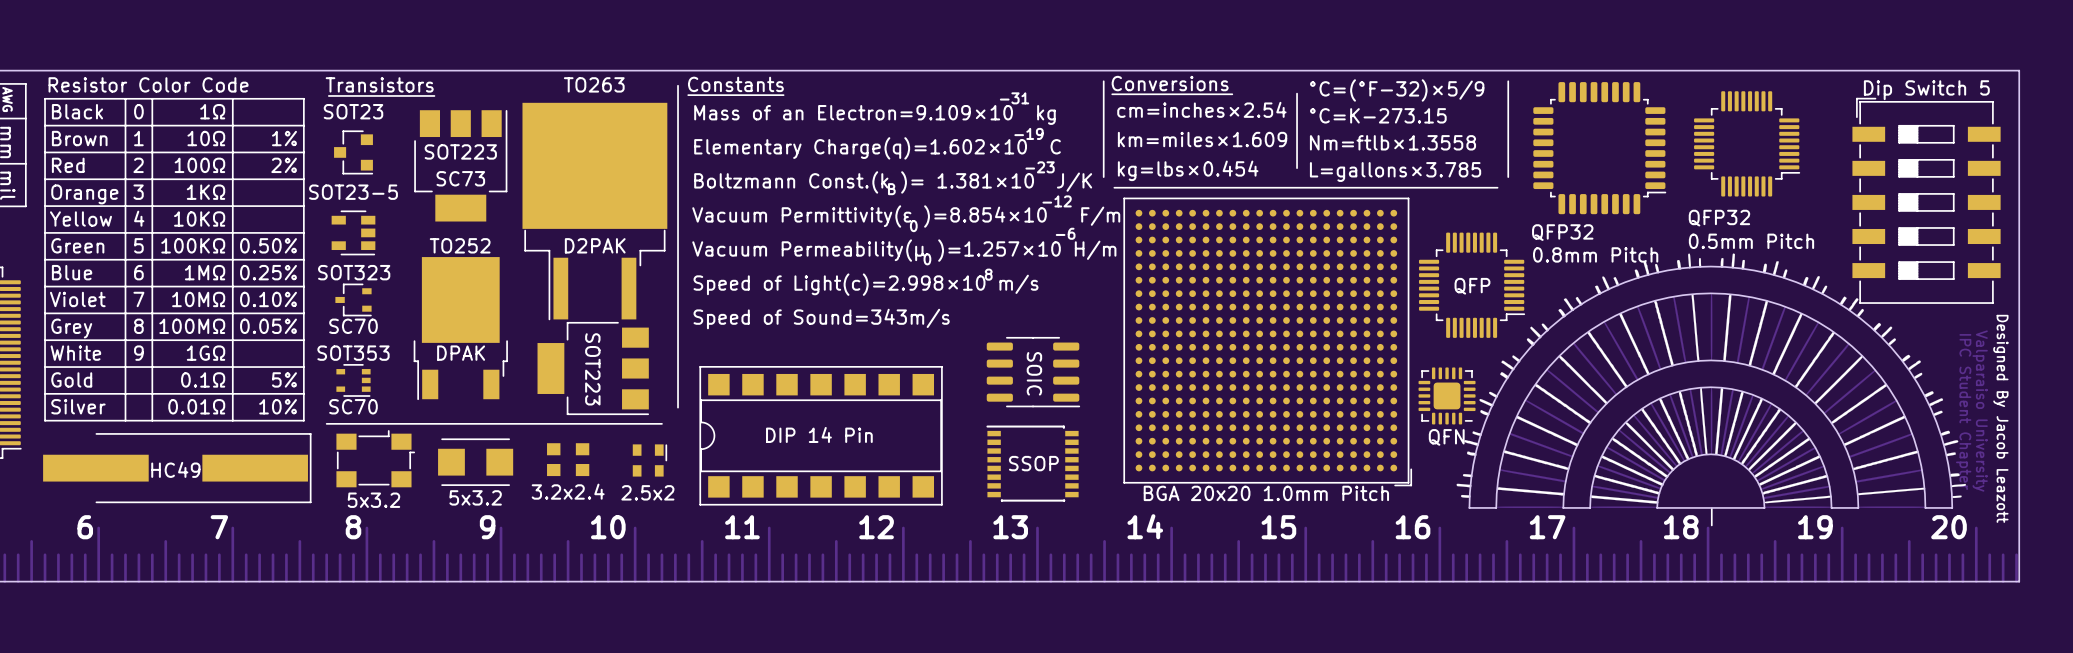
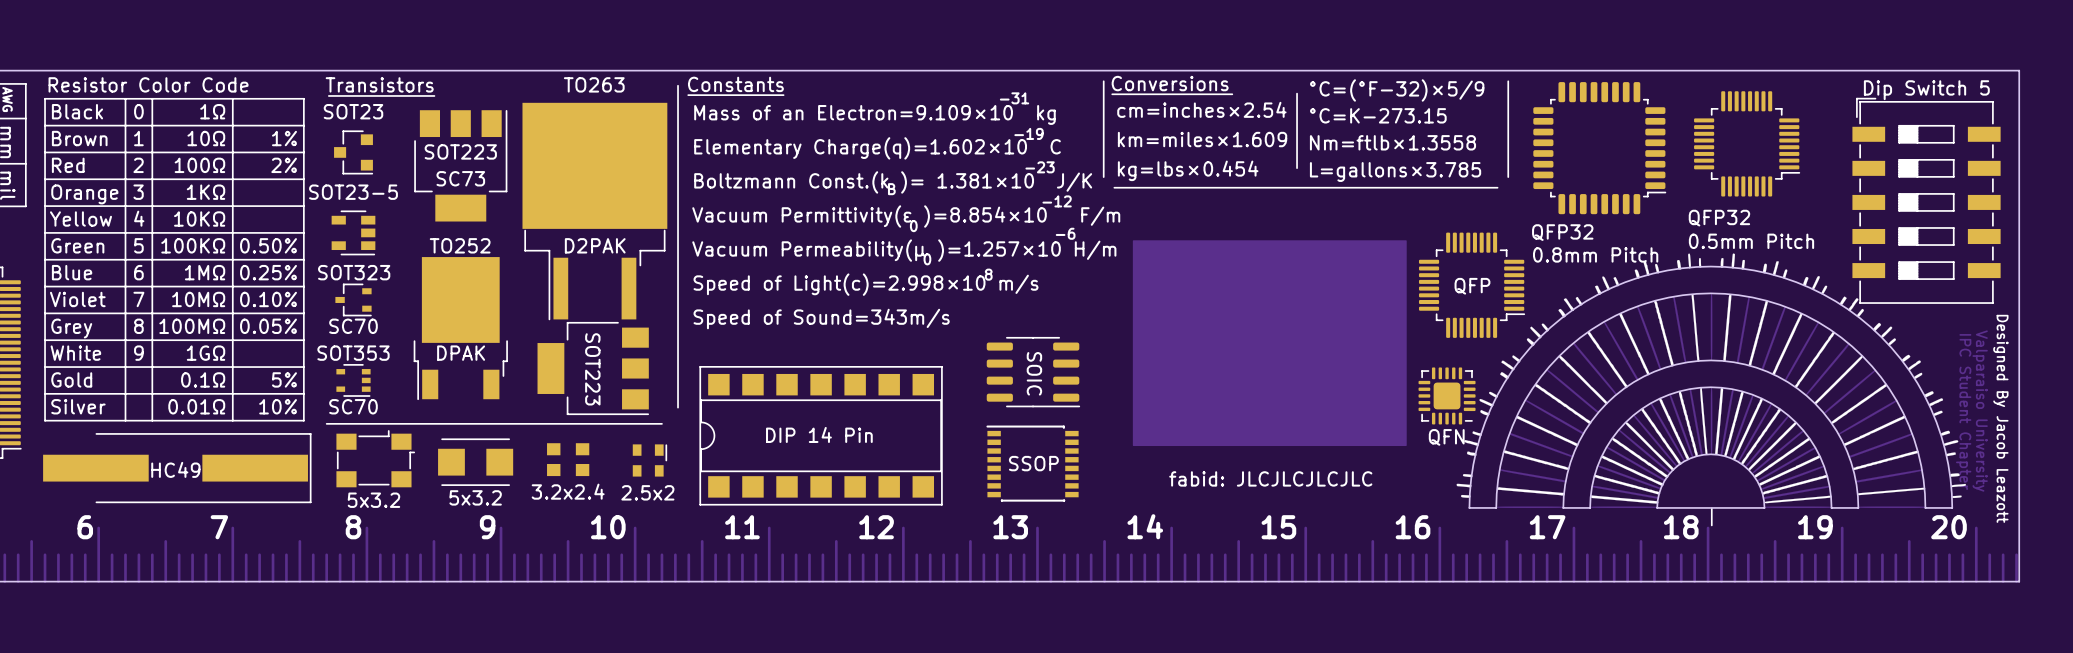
drawing: none -> [1132, 240, 1407, 447]
BGA 20x20 1.0mm Pitch: (1267, 341) -> none
text: none -> fabid: JLCJLCJLCJLC (1270, 478)

